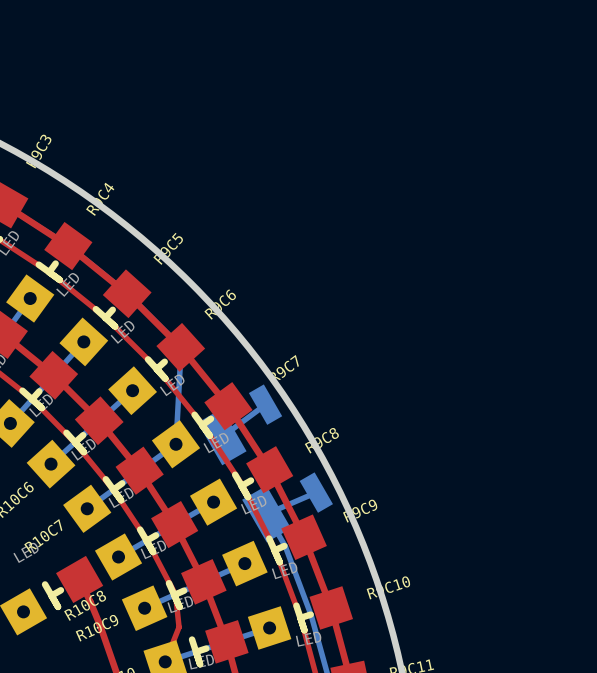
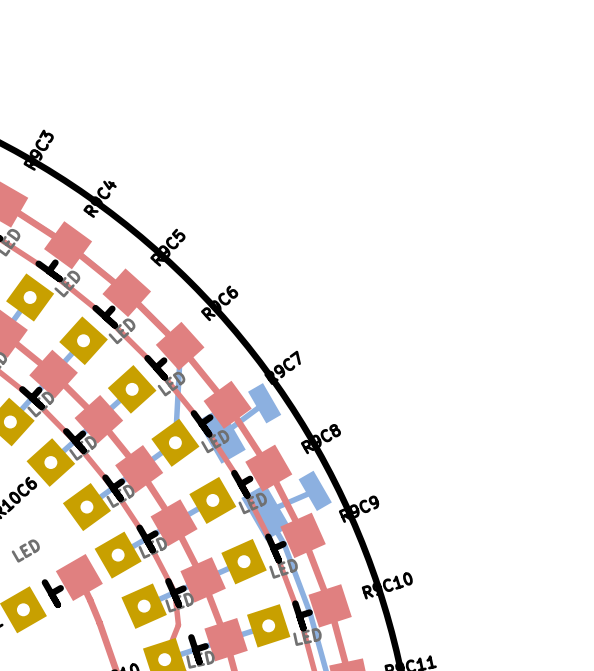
R10C7 name: R10C7 (43, 536) -> none
R10C8 name: R10C8 (85, 605) -> none
R10C9 name: R10C9 (97, 628) -> none

